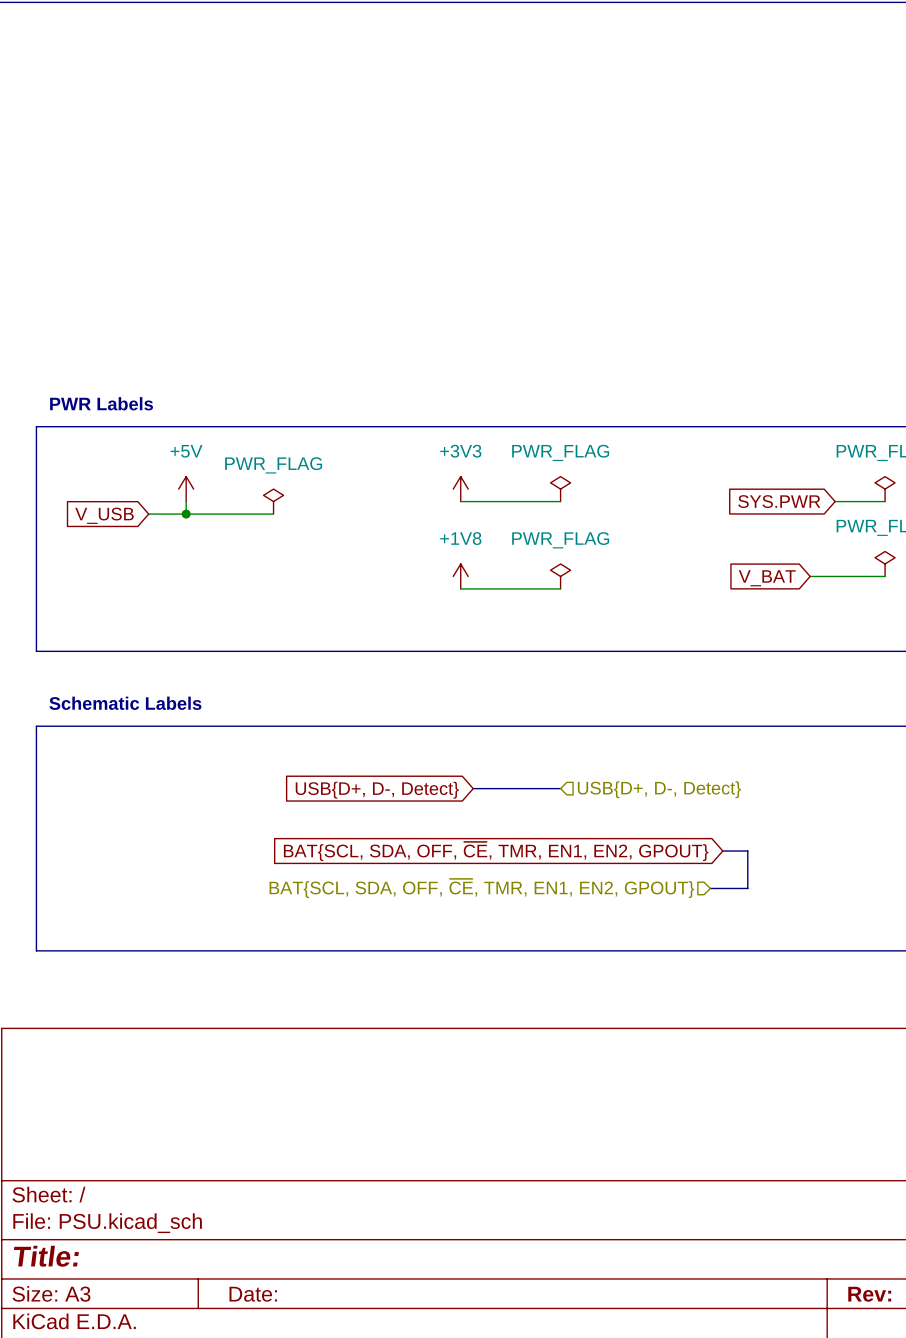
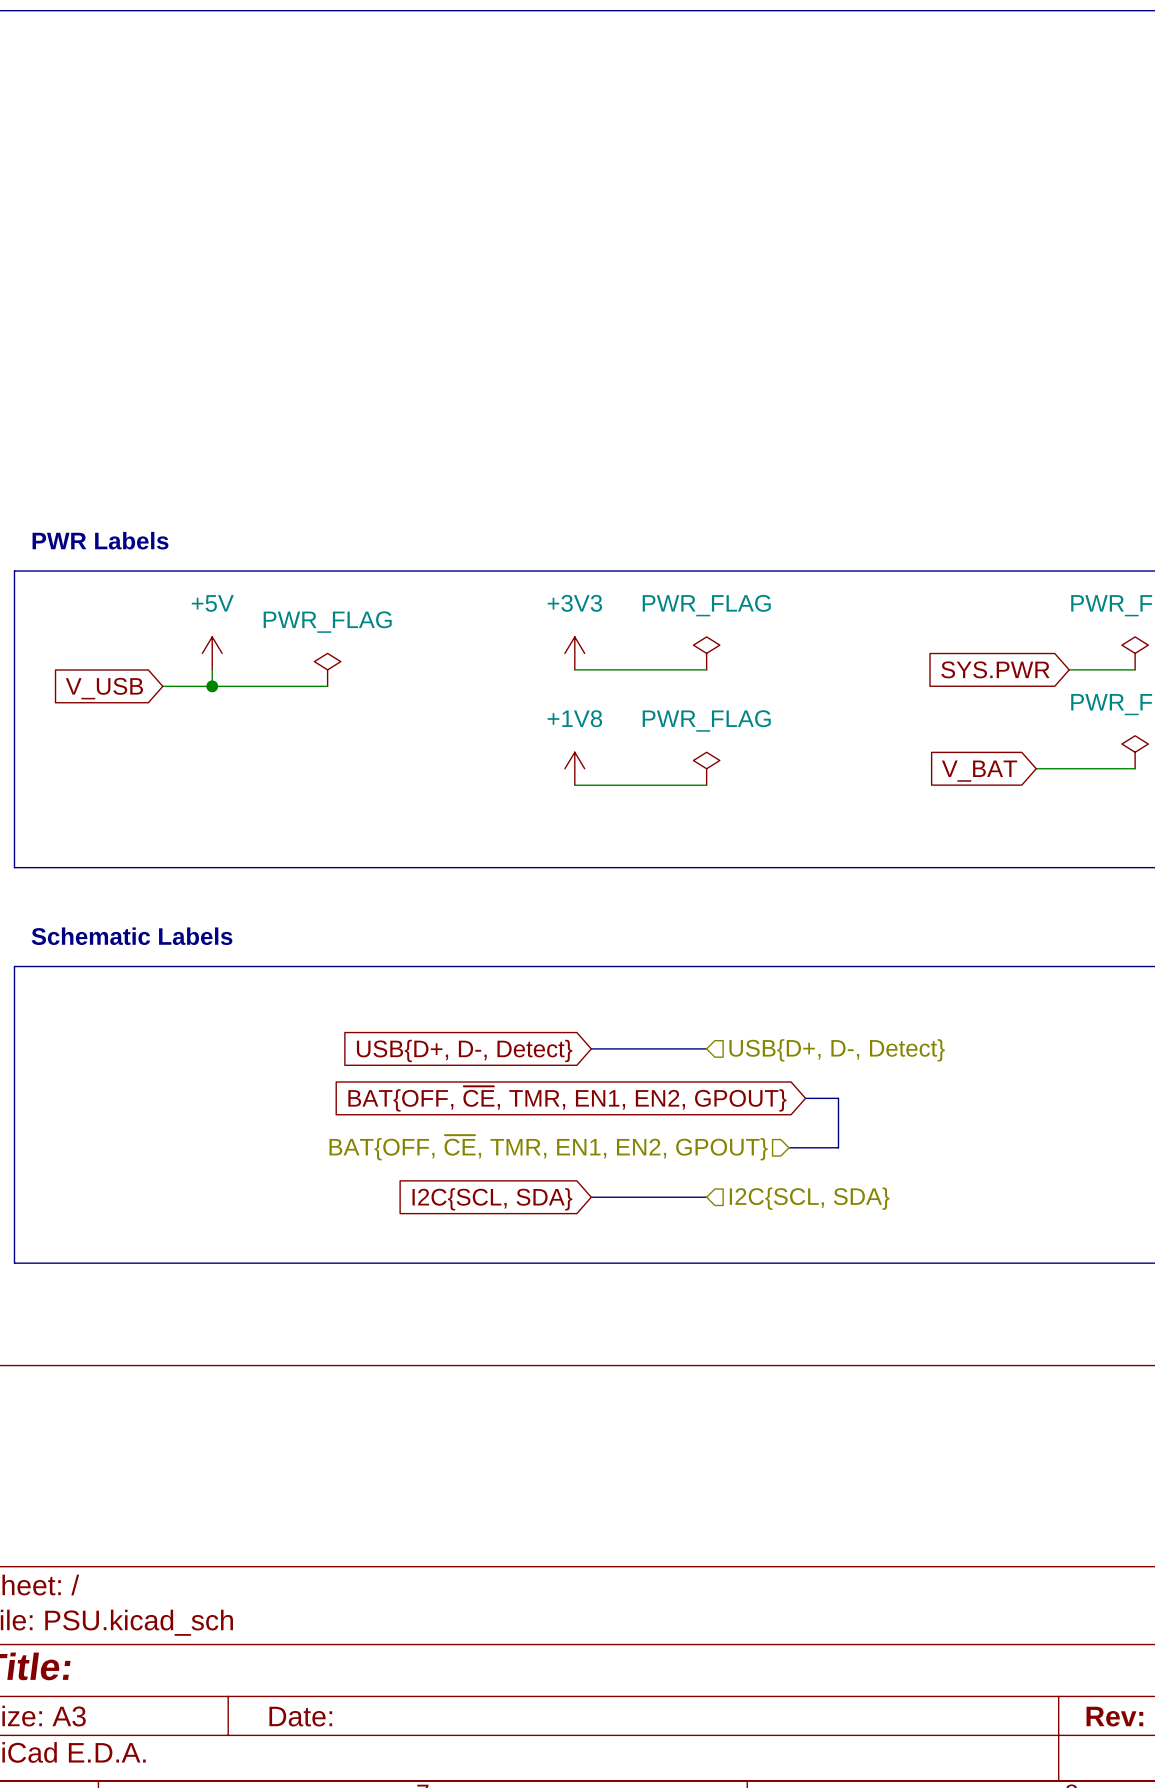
global label: BAT{SCL, SDA, OFF, ~{CE}, TMR, EN1, EN2, GPOUT} (496, 851) -> BAT{OFF, ~{CE}, TMR, EN1, EN2, GPOUT} (567, 1098)
bus: (722, 851) (747, 851) (747, 888) (710, 888) -> (805, 1098) (838, 1098) (838, 1147) (789, 1147)
hierarchical label: BAT{SCL, SDA, OFF, ~{CE}, TMR, EN1, EN2, GPOUT} (481, 888) -> BAT{OFF, ~{CE}, TMR, EN1, EN2, GPOUT} (548, 1147)
bus: none -> (591, 1197) (706, 1197)
global label: none -> I2C{SCL, SDA} (492, 1199)
hierarchical label: none -> I2C{SCL, SDA} (809, 1198)

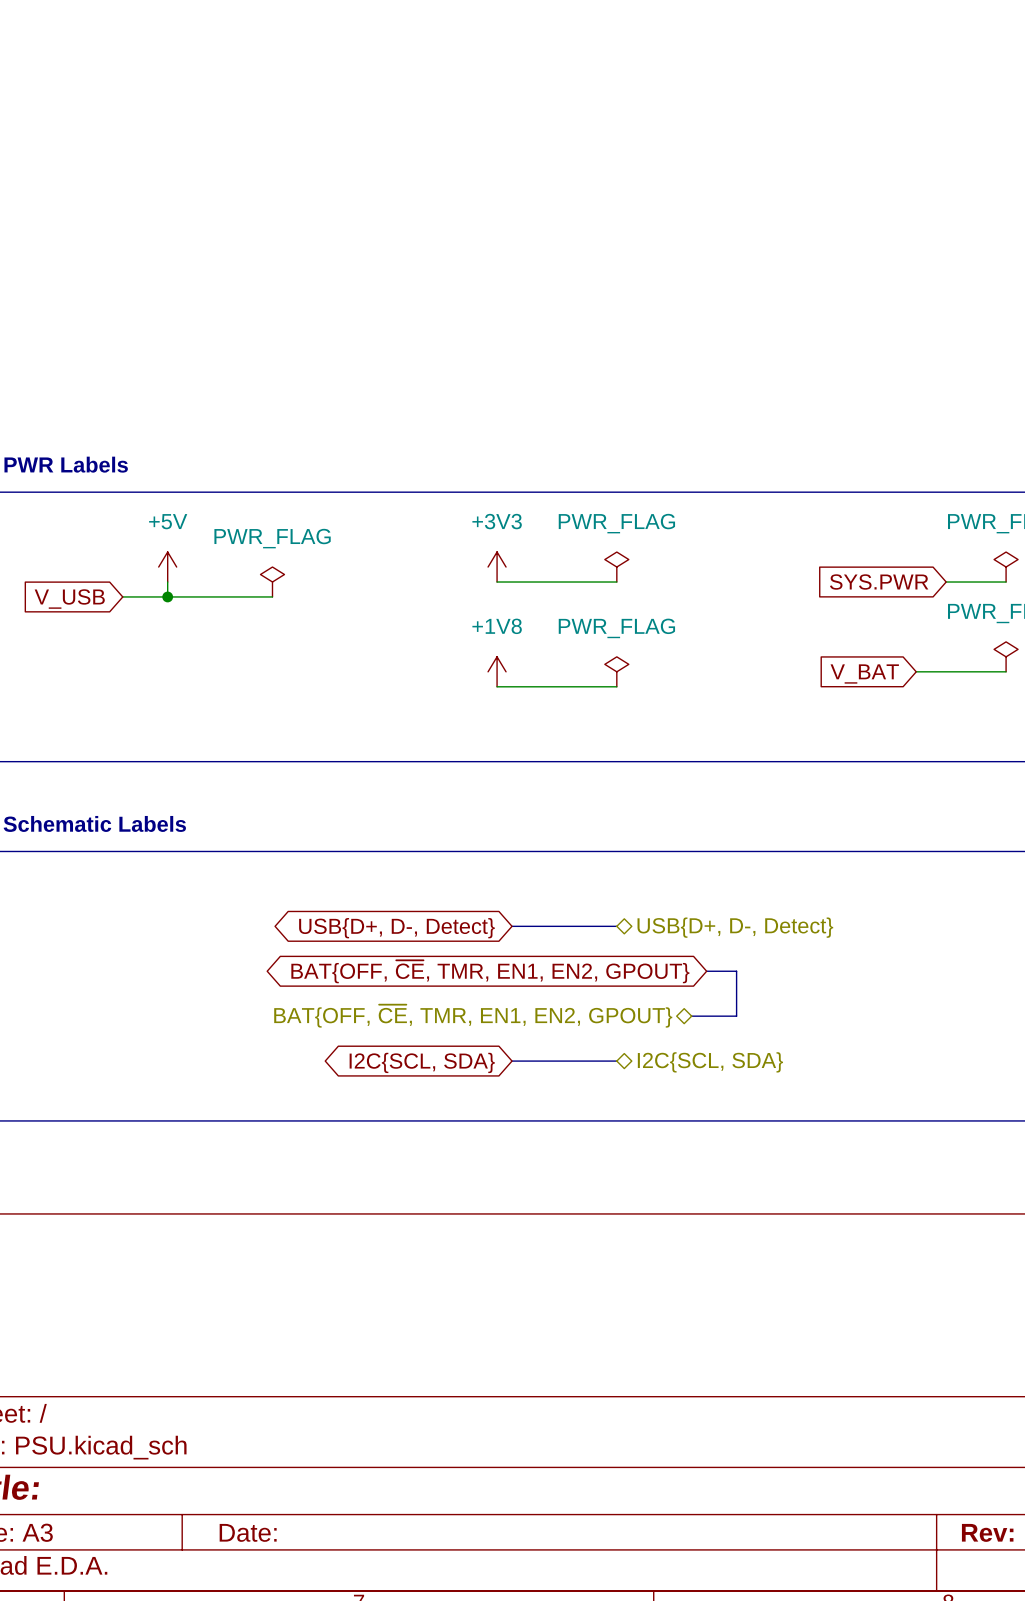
global label shape: input (464, 1050) -> bidirectional (396, 928)
hierarchical label shape: input (837, 1050) -> bidirectional (735, 927)
global label shape: input (567, 1098) -> bidirectional (490, 971)
hierarchical label shape: input (548, 1147) -> bidirectional (473, 1016)
hierarchical label shape: input (809, 1198) -> bidirectional (710, 1062)
global label shape: input (492, 1199) -> bidirectional (422, 1062)

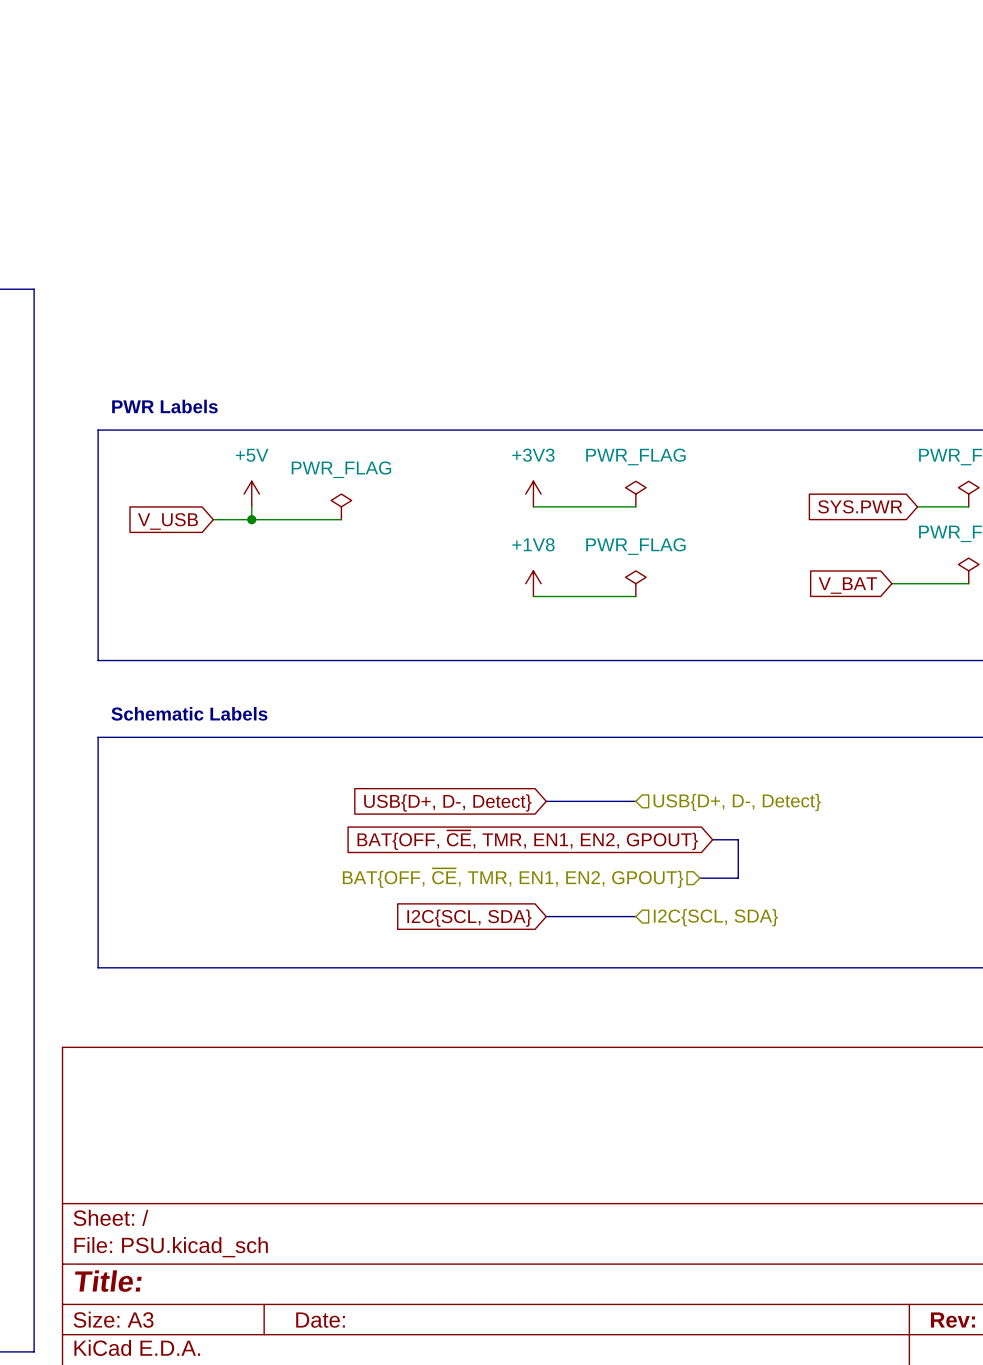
hierarchical label shape: bidirectional (735, 927) -> input (737, 802)
global label shape: bidirectional (396, 928) -> input (447, 802)
global label shape: bidirectional (490, 971) -> input (527, 840)
hierarchical label shape: bidirectional (473, 1016) -> input (513, 878)
global label shape: bidirectional (422, 1062) -> input (469, 918)
hierarchical label shape: bidirectional (710, 1062) -> input (715, 917)

